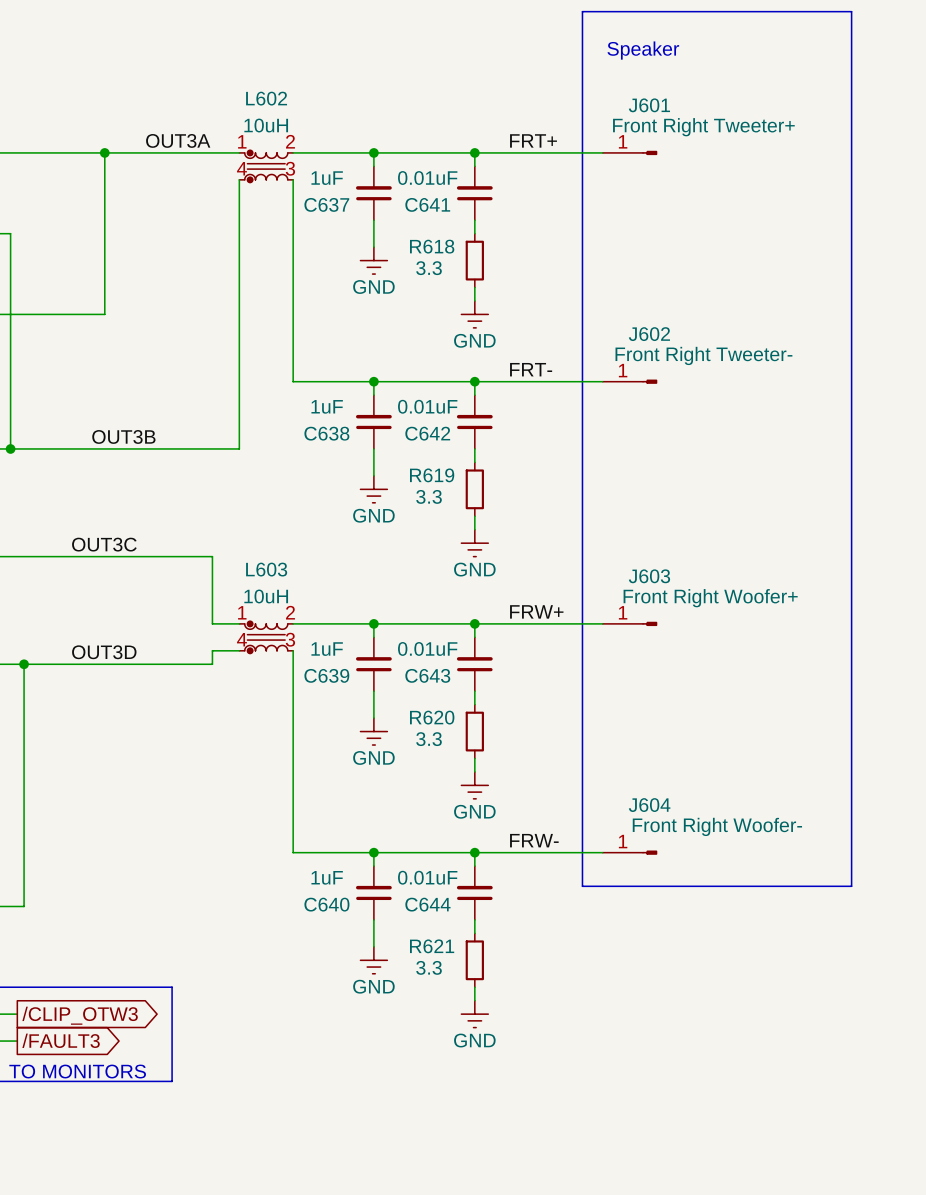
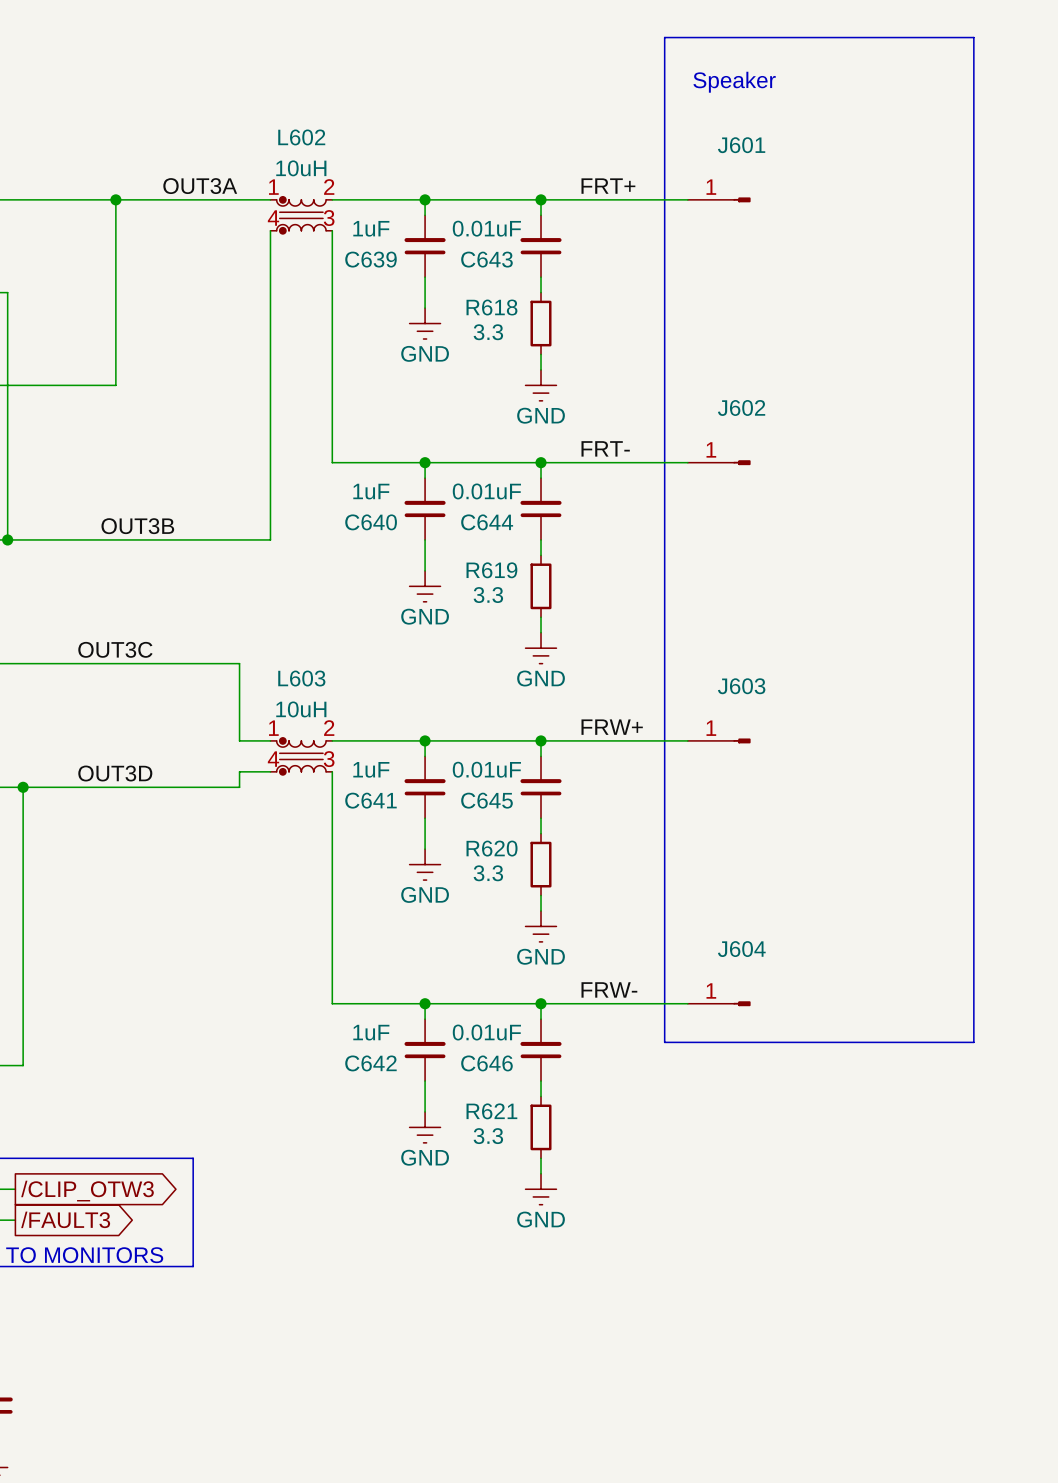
J601 value: Front Right Tweeter+ (703, 127) -> none
C637 name: C637 (326, 204) -> C639 (370, 259)
C641 name: C641 (427, 204) -> C643 (486, 259)
J602 value: Front Right Tweeter- (703, 355) -> none
C638 name: C638 (326, 433) -> C640 (371, 522)
C642 name: C642 (427, 433) -> C644 (487, 522)
J603 value: Front Right Woofer+ (710, 598) -> none
C639 name: C639 (326, 675) -> C641 (370, 800)
C643 name: C643 (427, 675) -> C645 (486, 800)
J604 value: Front Right Woofer- (717, 826) -> none
C640 name: C640 (326, 904) -> C642 (370, 1063)
C644 name: C644 (427, 904) -> C646 (486, 1063)

